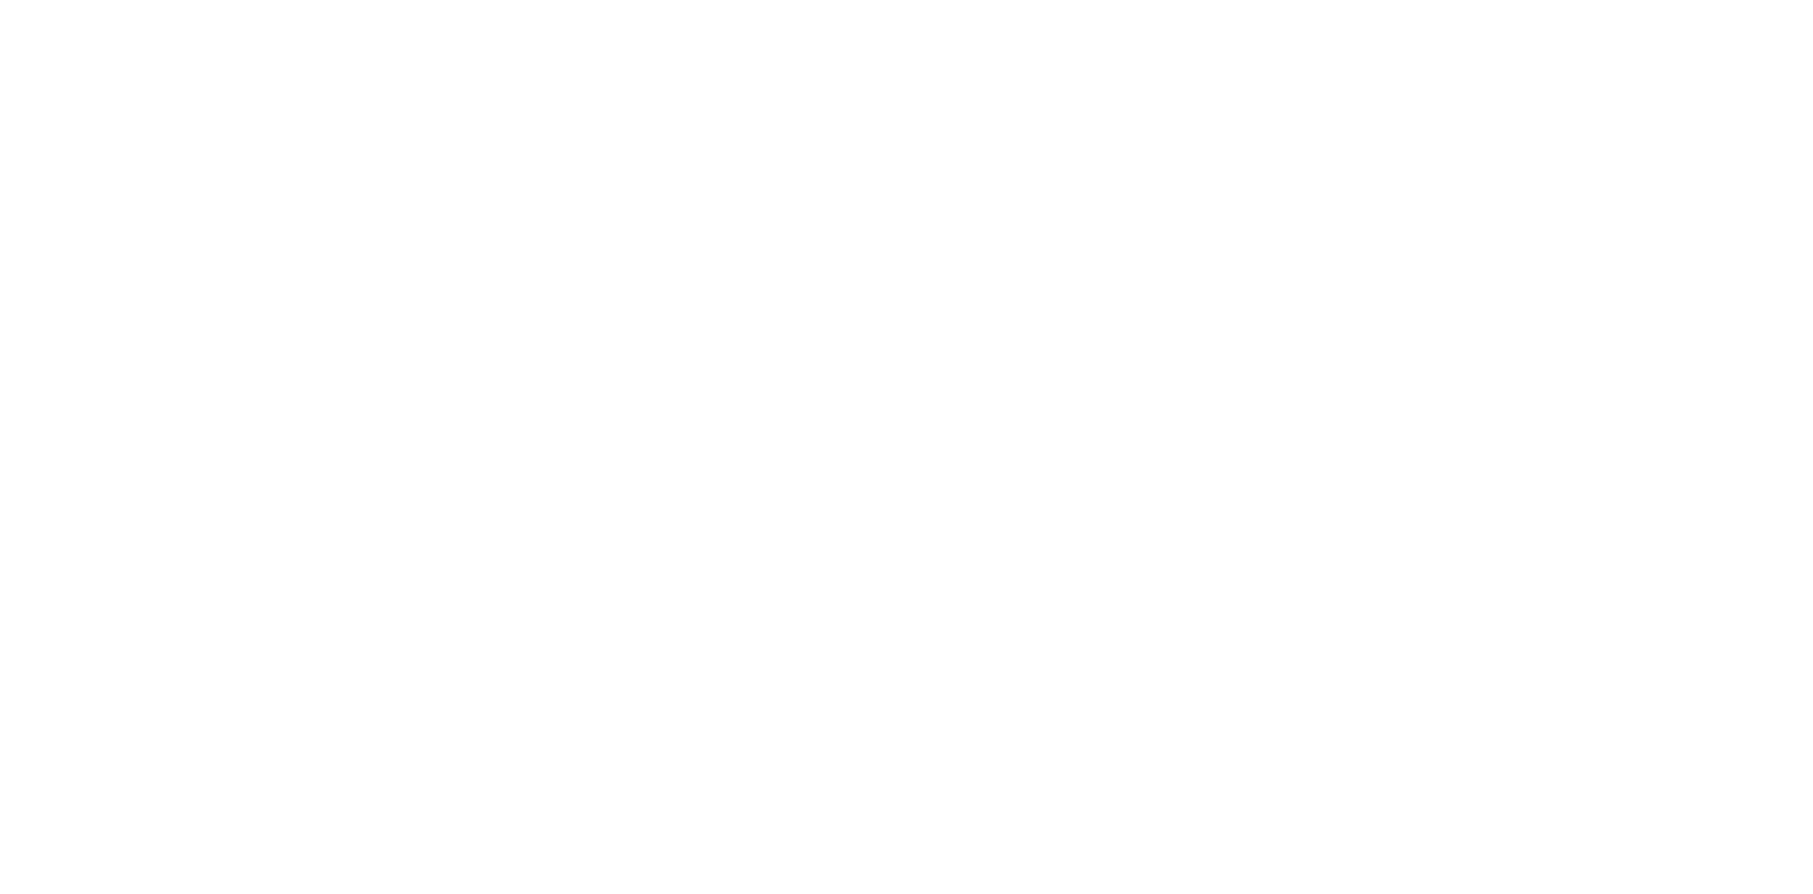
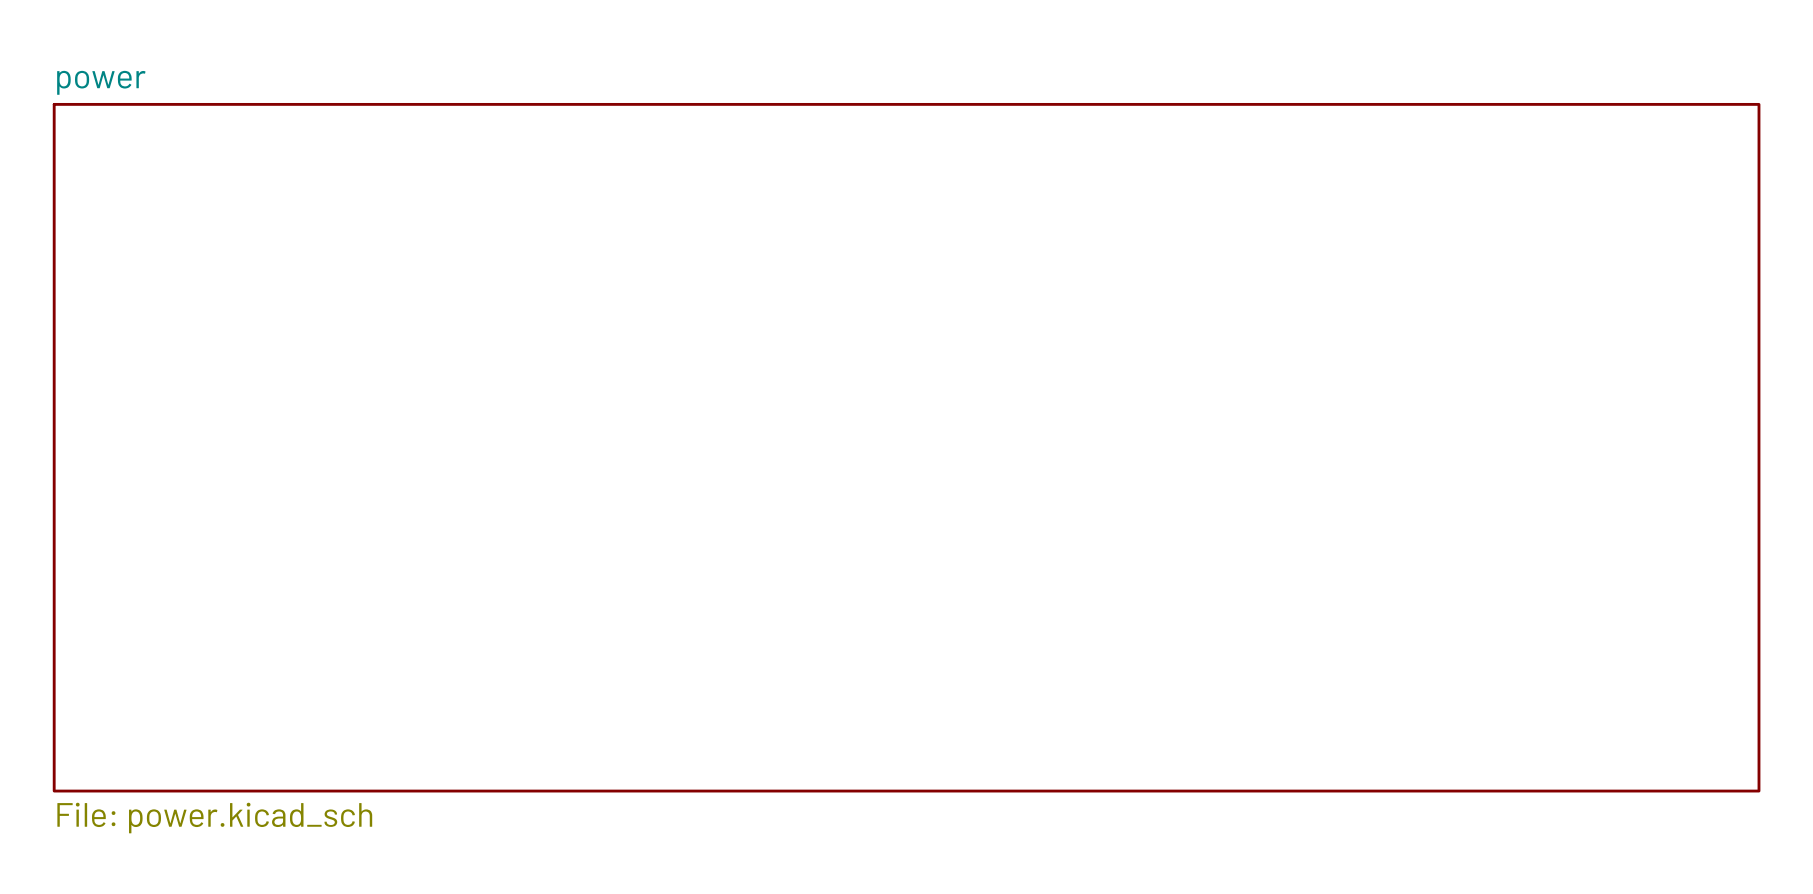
sheet power: none -> File: power.kicad_sch (906, 447)

